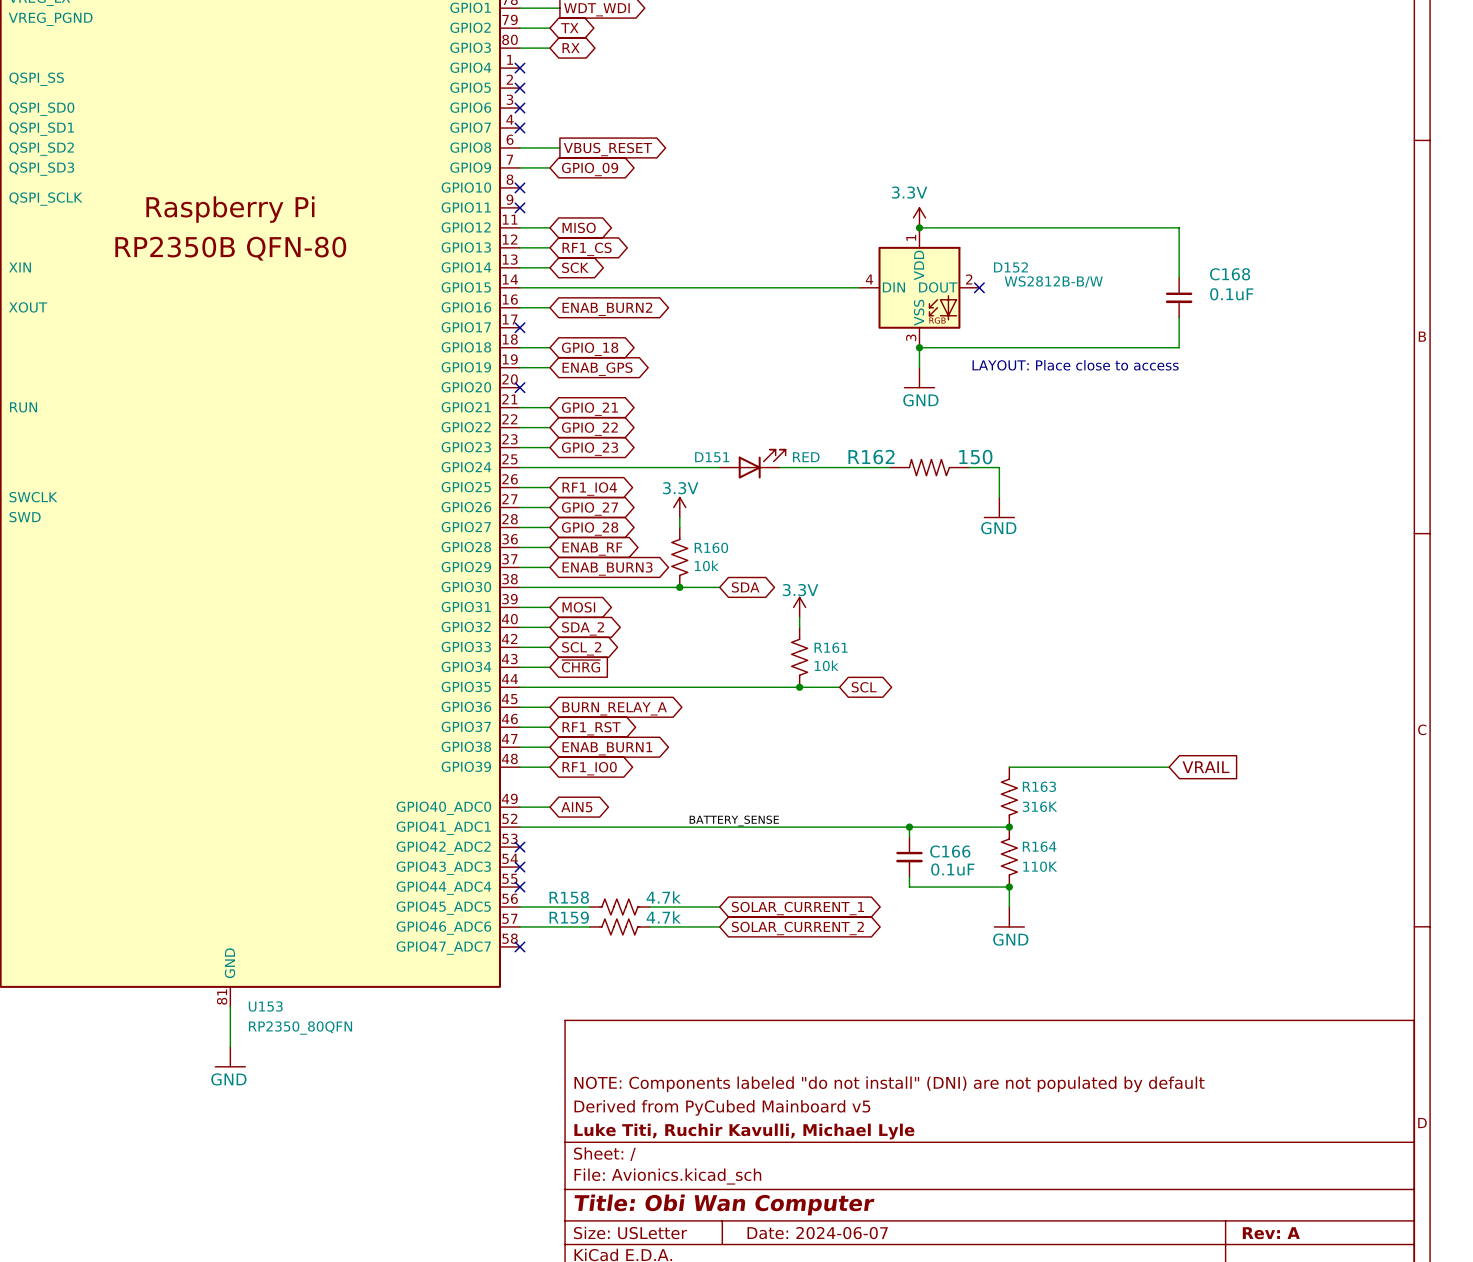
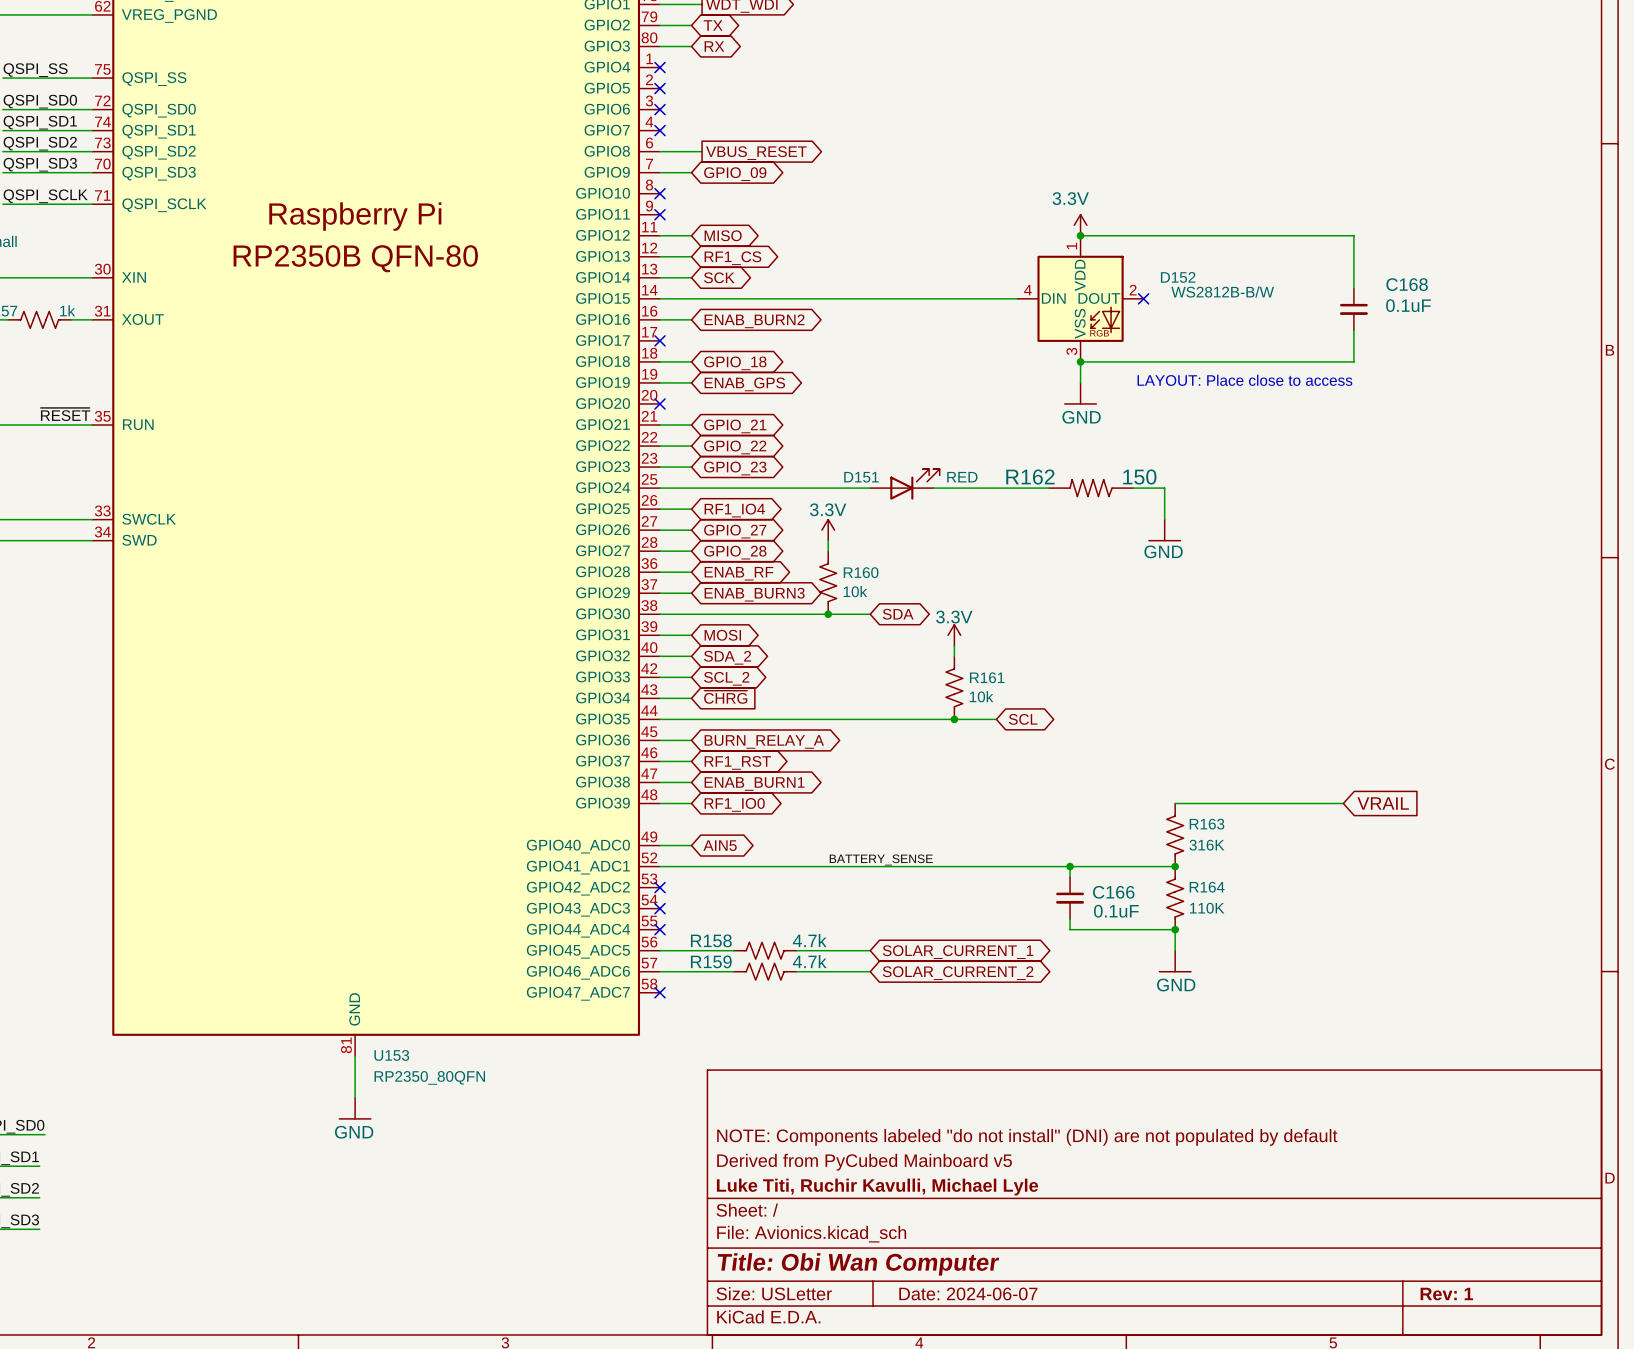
title block: Rev: A (1271, 1233) -> Rev: 1 (1446, 1294)

